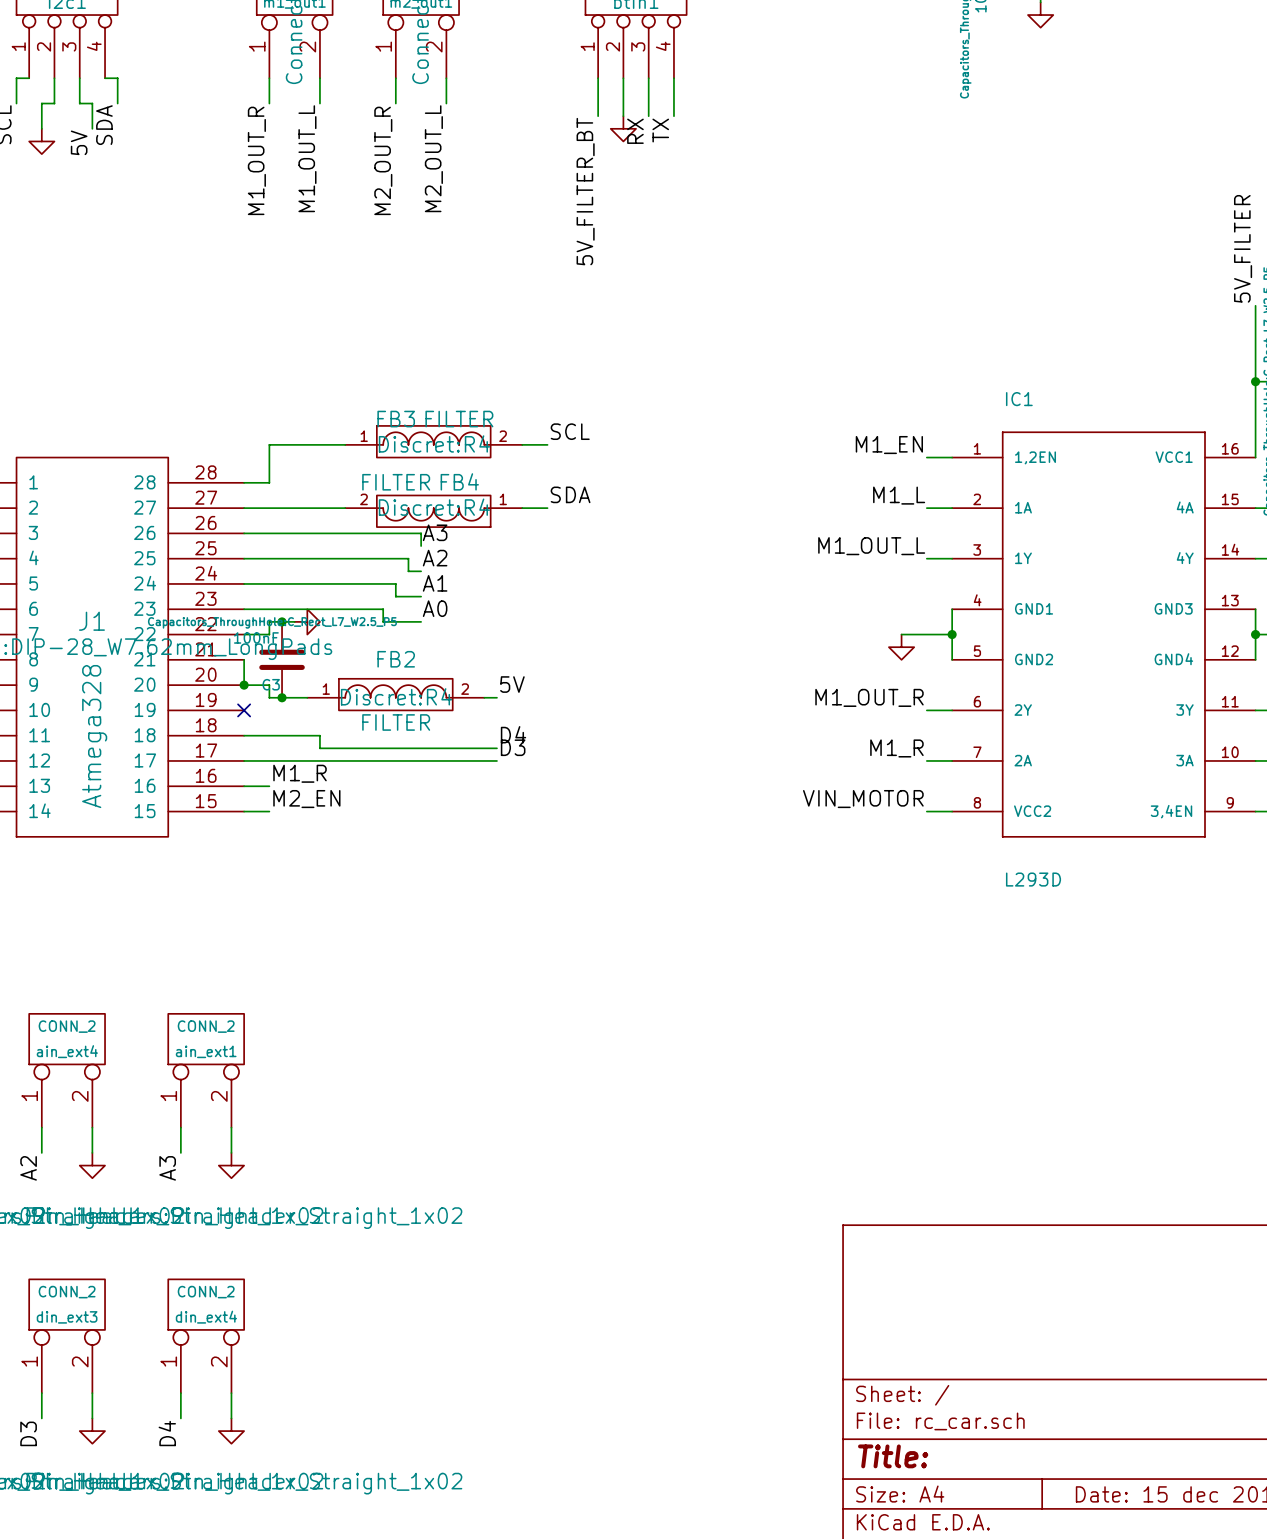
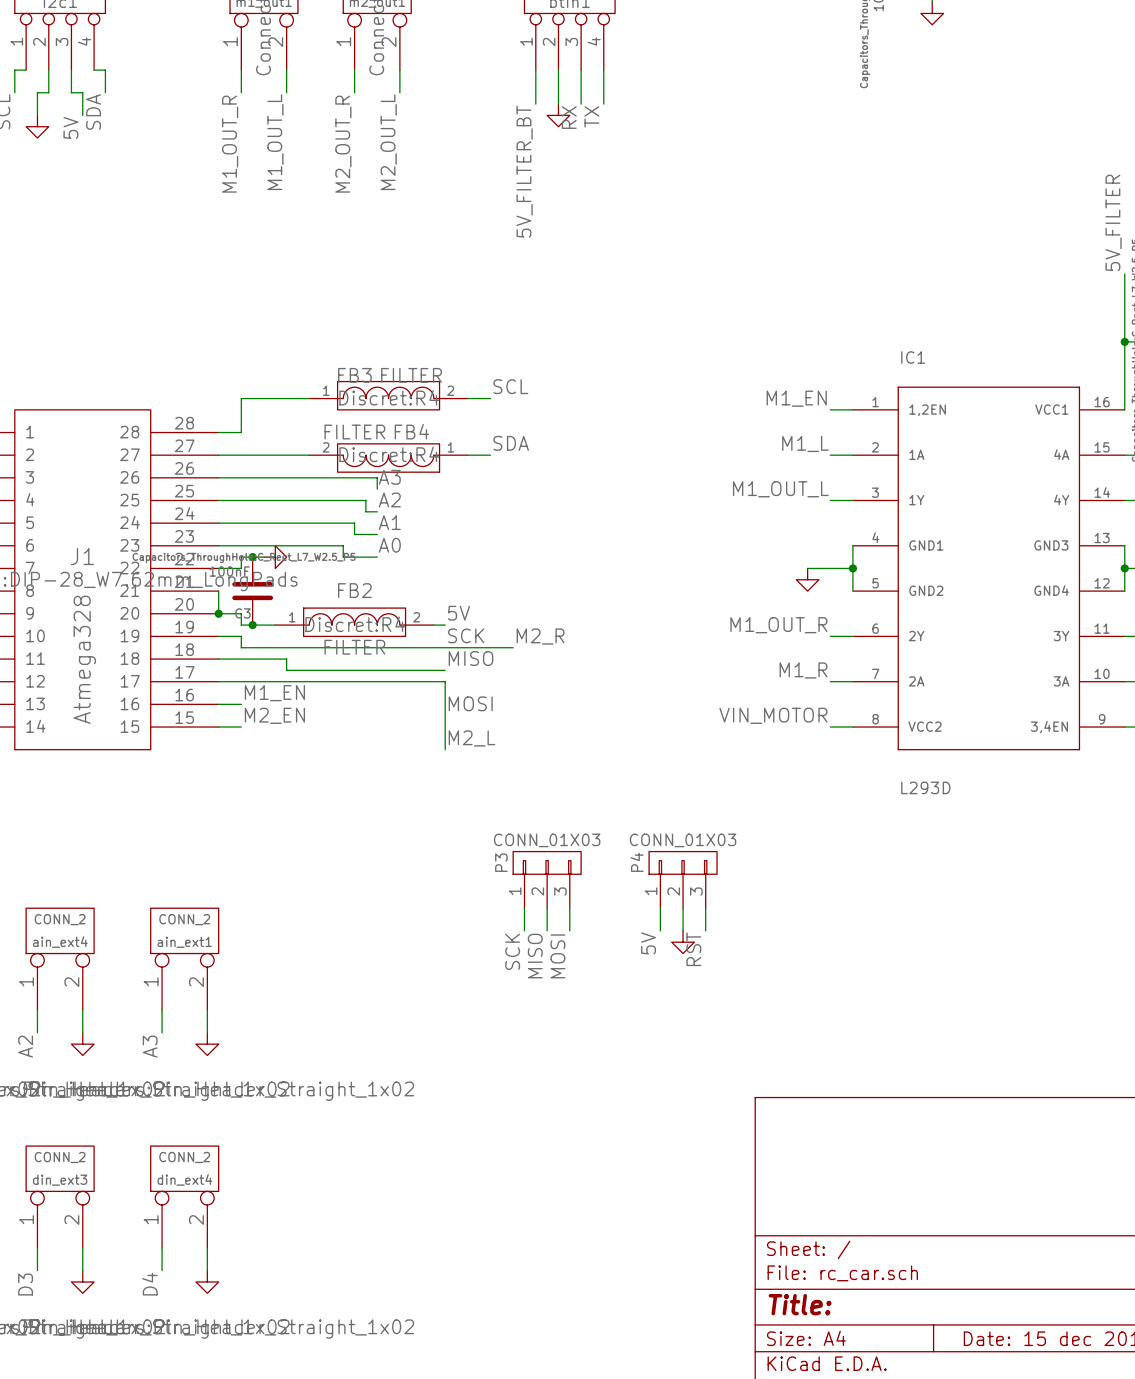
label: none -> SCK (466, 635)
wire: none -> (218, 636) (241, 636) (241, 647) (513, 647)
no-connect mark: (244, 710) -> none
label: none -> M2_R (540, 636)
label: D4 (513, 734) -> MISO (471, 658)
label: D3 (513, 747) -> none
wire: none -> (445, 681) (445, 749)
label: M1_R (300, 773) -> M1_EN (274, 693)
label: none -> MOSI (470, 703)
label: none -> M2_L (471, 738)
P3: none -> CONN_01X03 (547, 879)
P4: none -> CONN_01X03 (683, 879)
wire: none -> (524, 908) (524, 930)
wire: none -> (547, 908) (547, 930)
wire: none -> (569, 908) (569, 930)
wire: none -> (660, 908) (660, 930)
wire: none -> (683, 908) (683, 930)
wire: none -> (705, 908) (705, 930)
power symbol: none -> (683, 942)
label: none -> 5V (648, 943)
label: none -> RST (693, 949)
label: none -> SCK (512, 951)
label: none -> MISO (535, 956)
label: none -> MOSI (557, 956)

